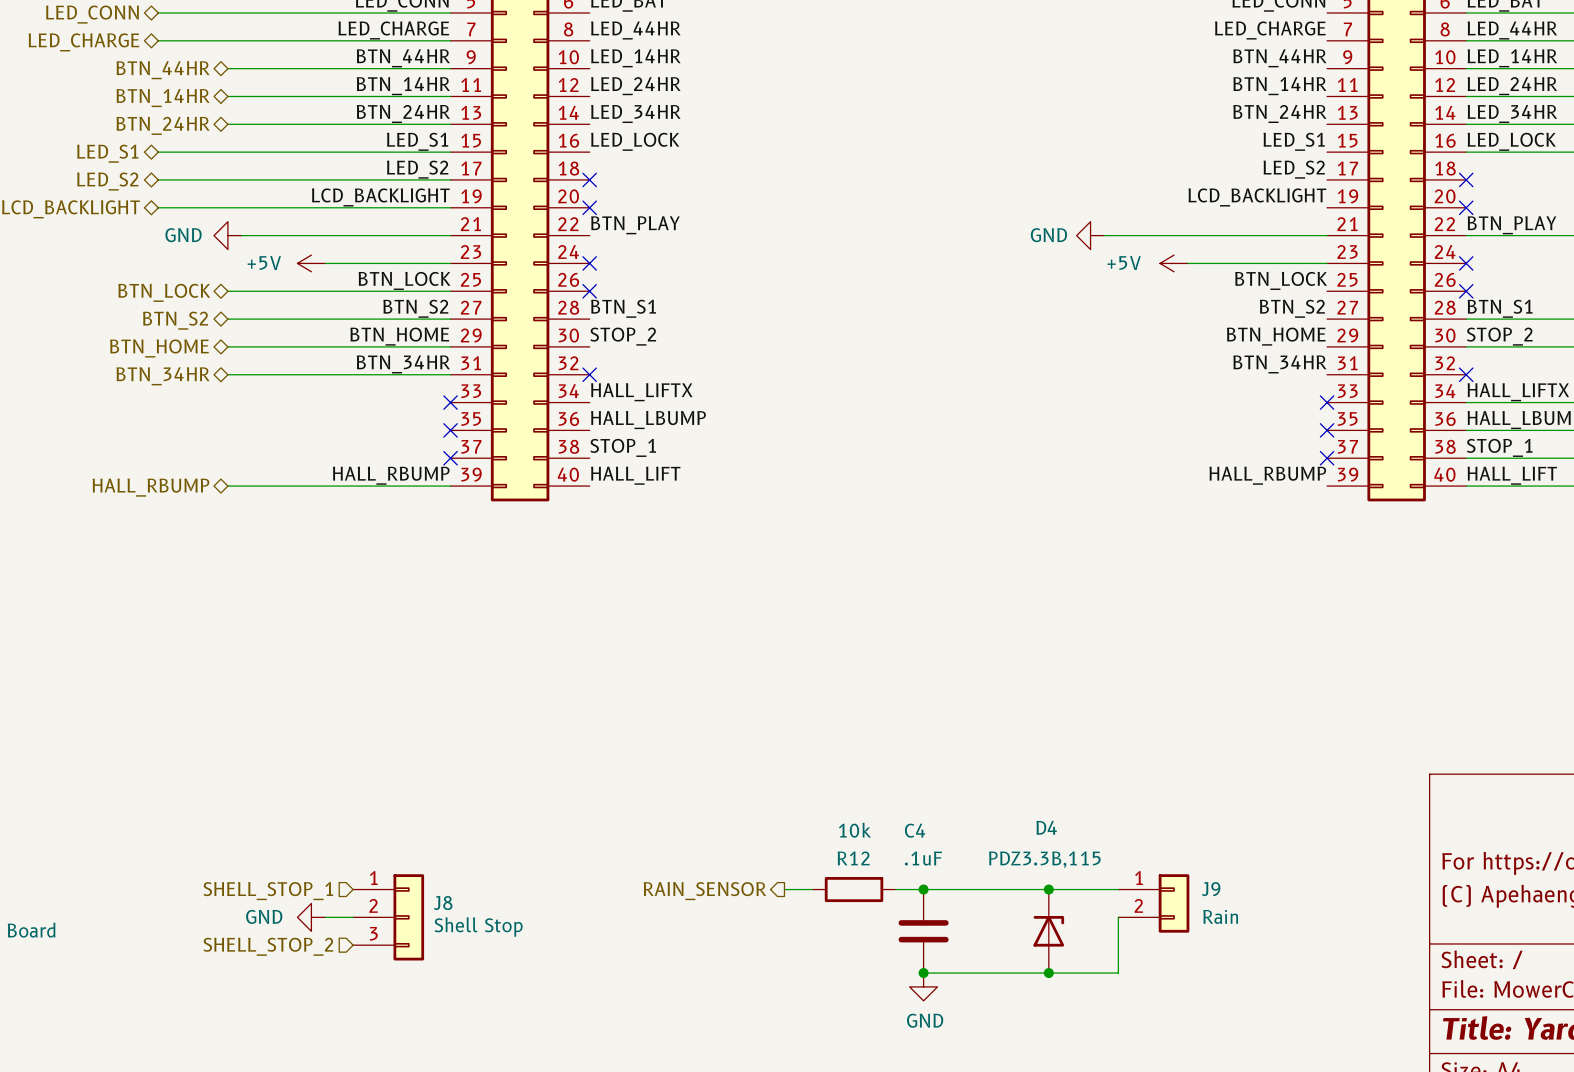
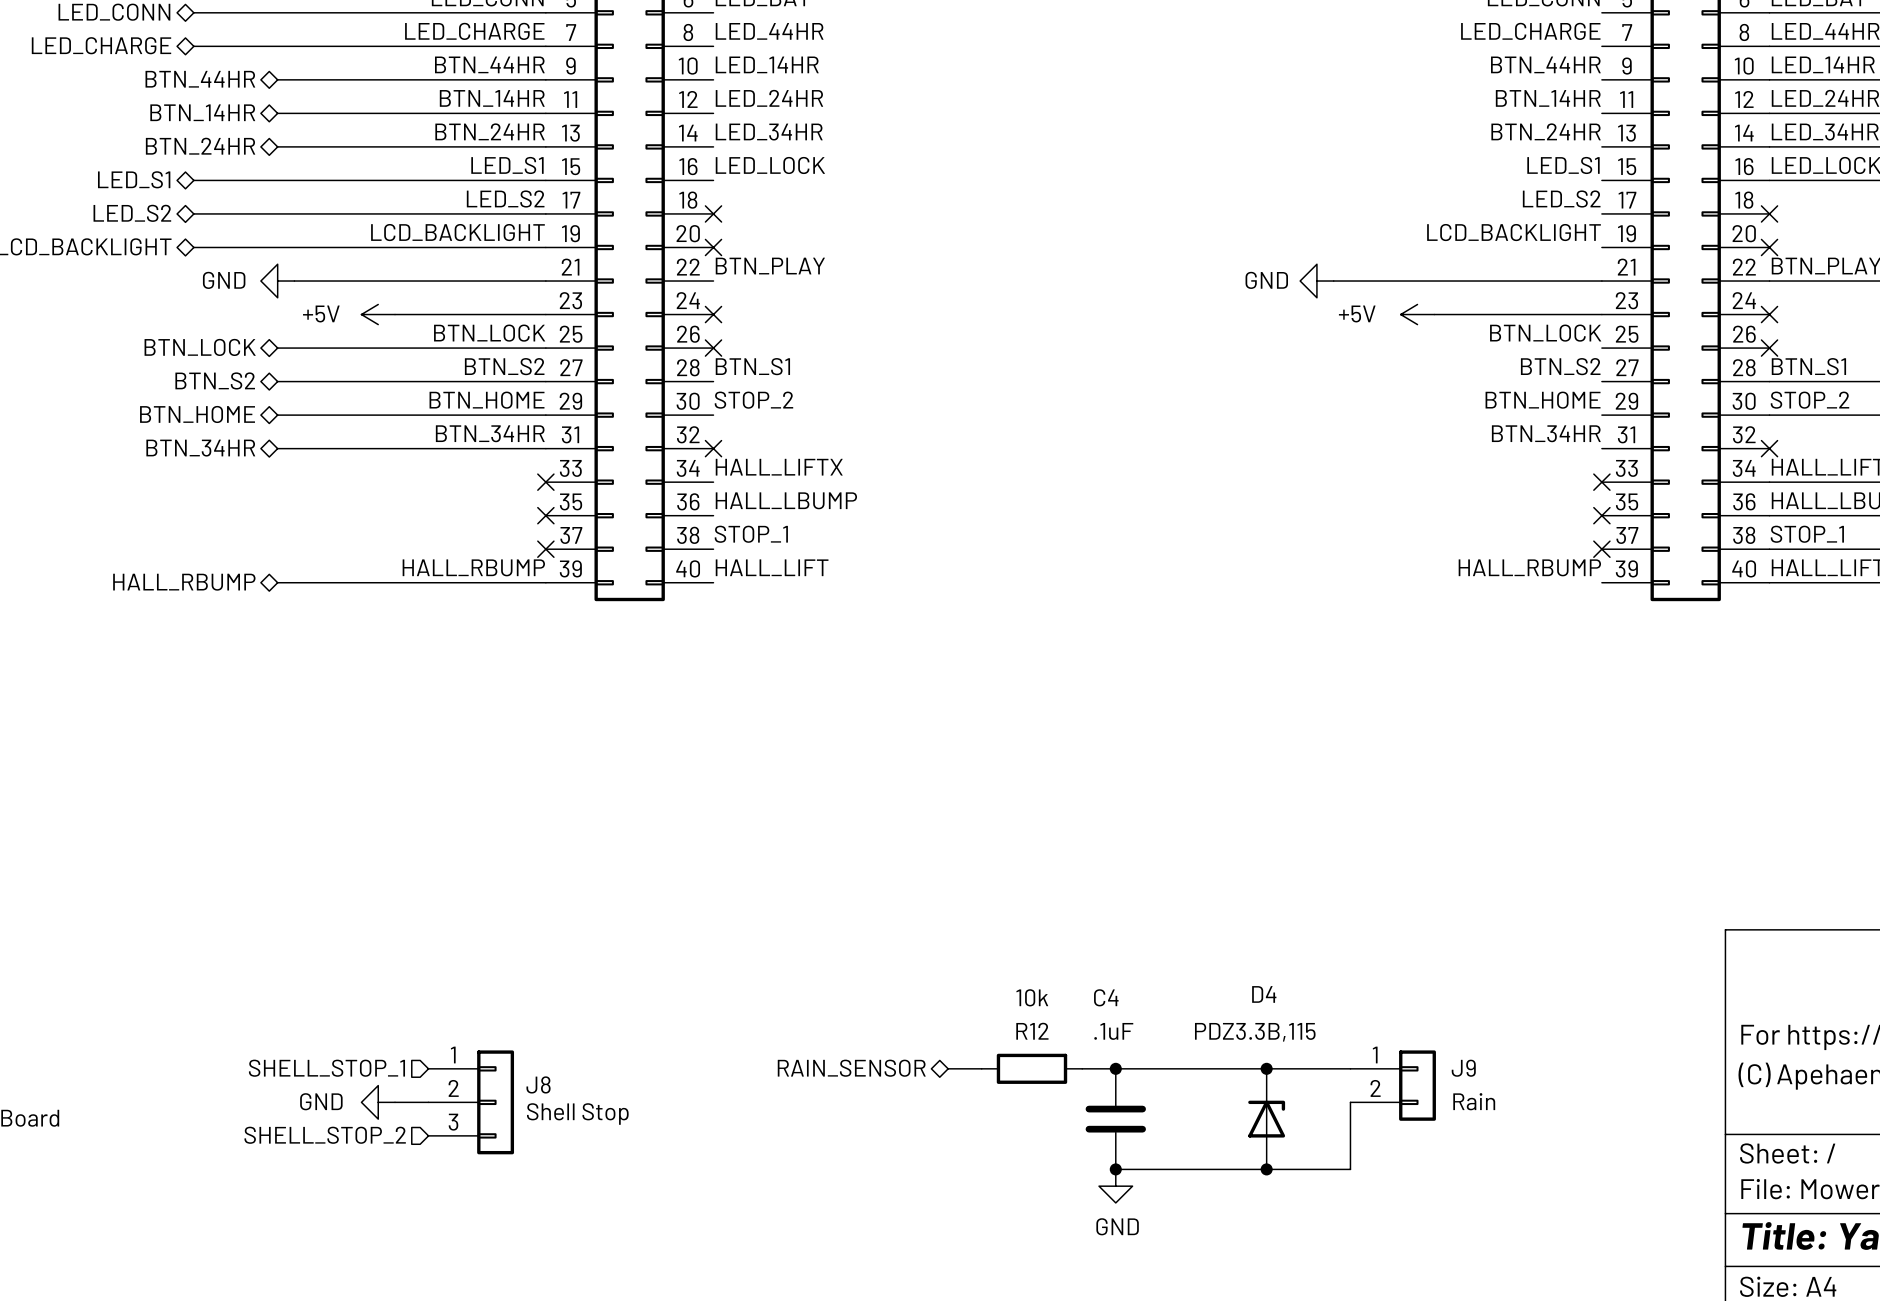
hierarchical label shape: output (704, 891) -> bidirectional (851, 1068)

